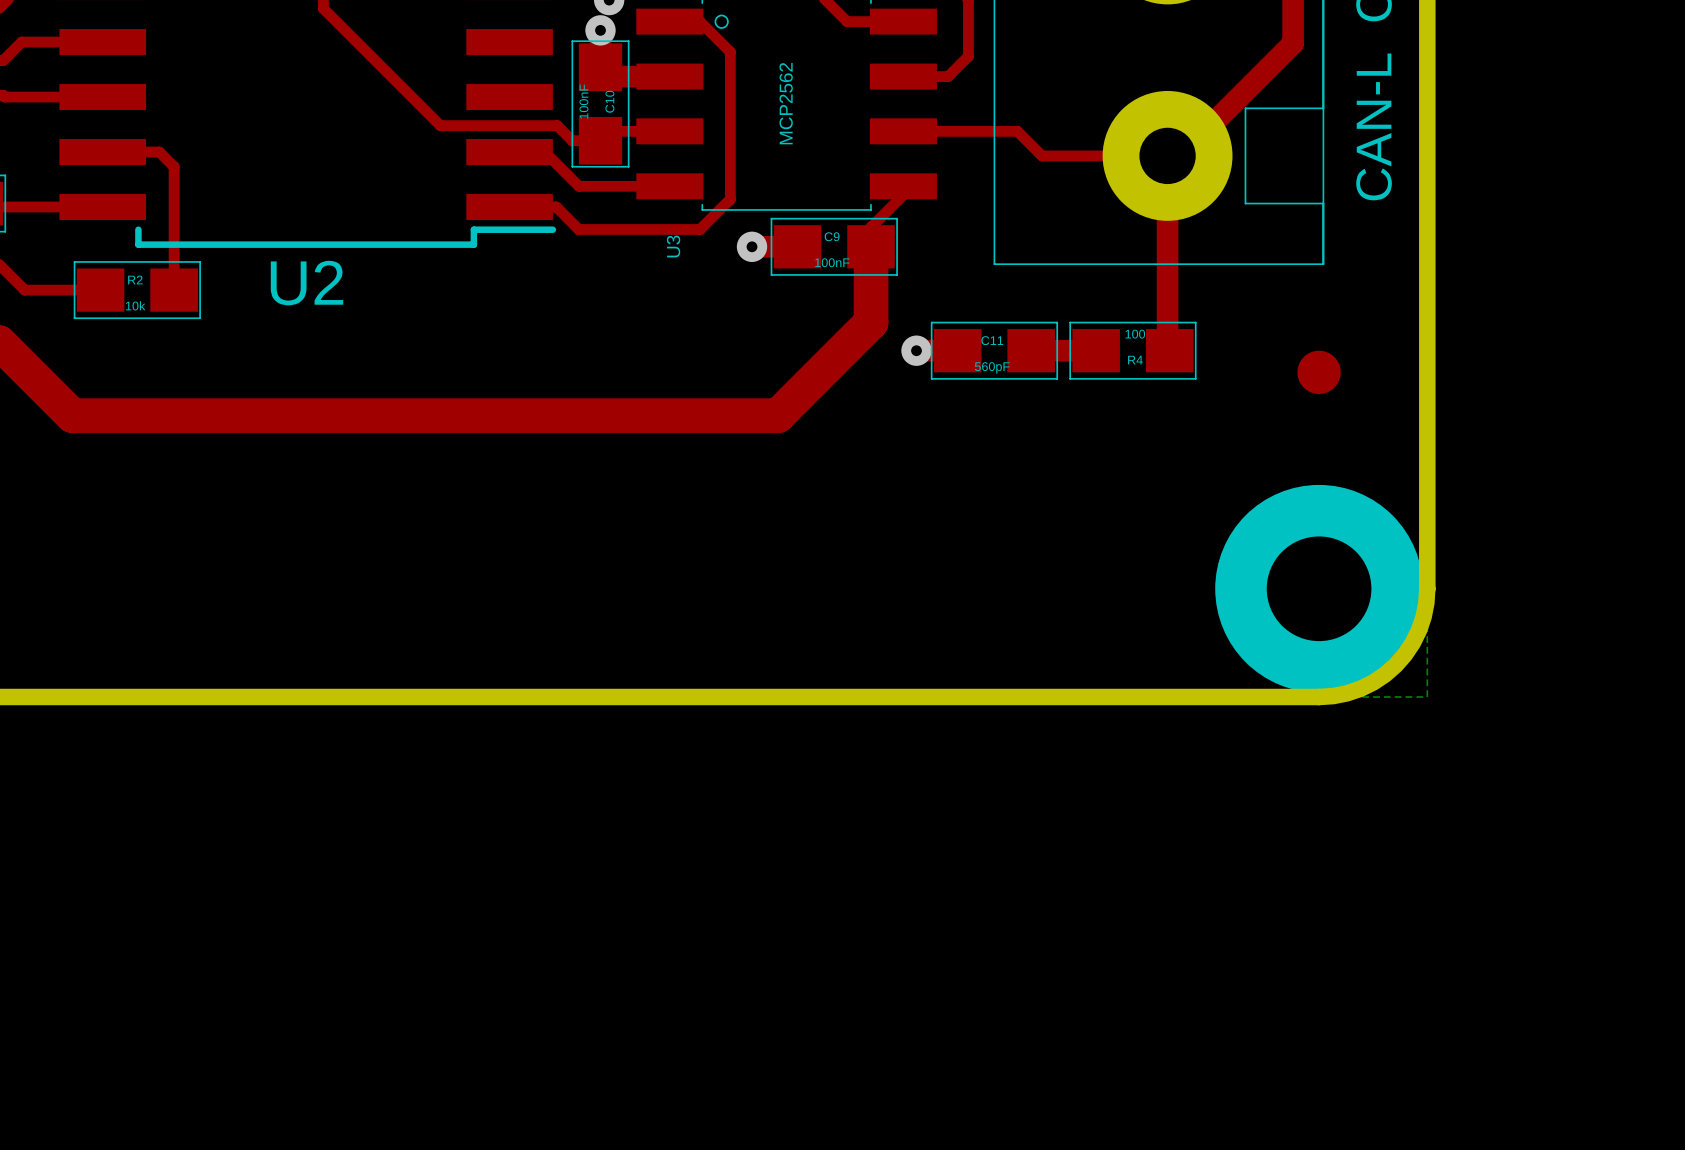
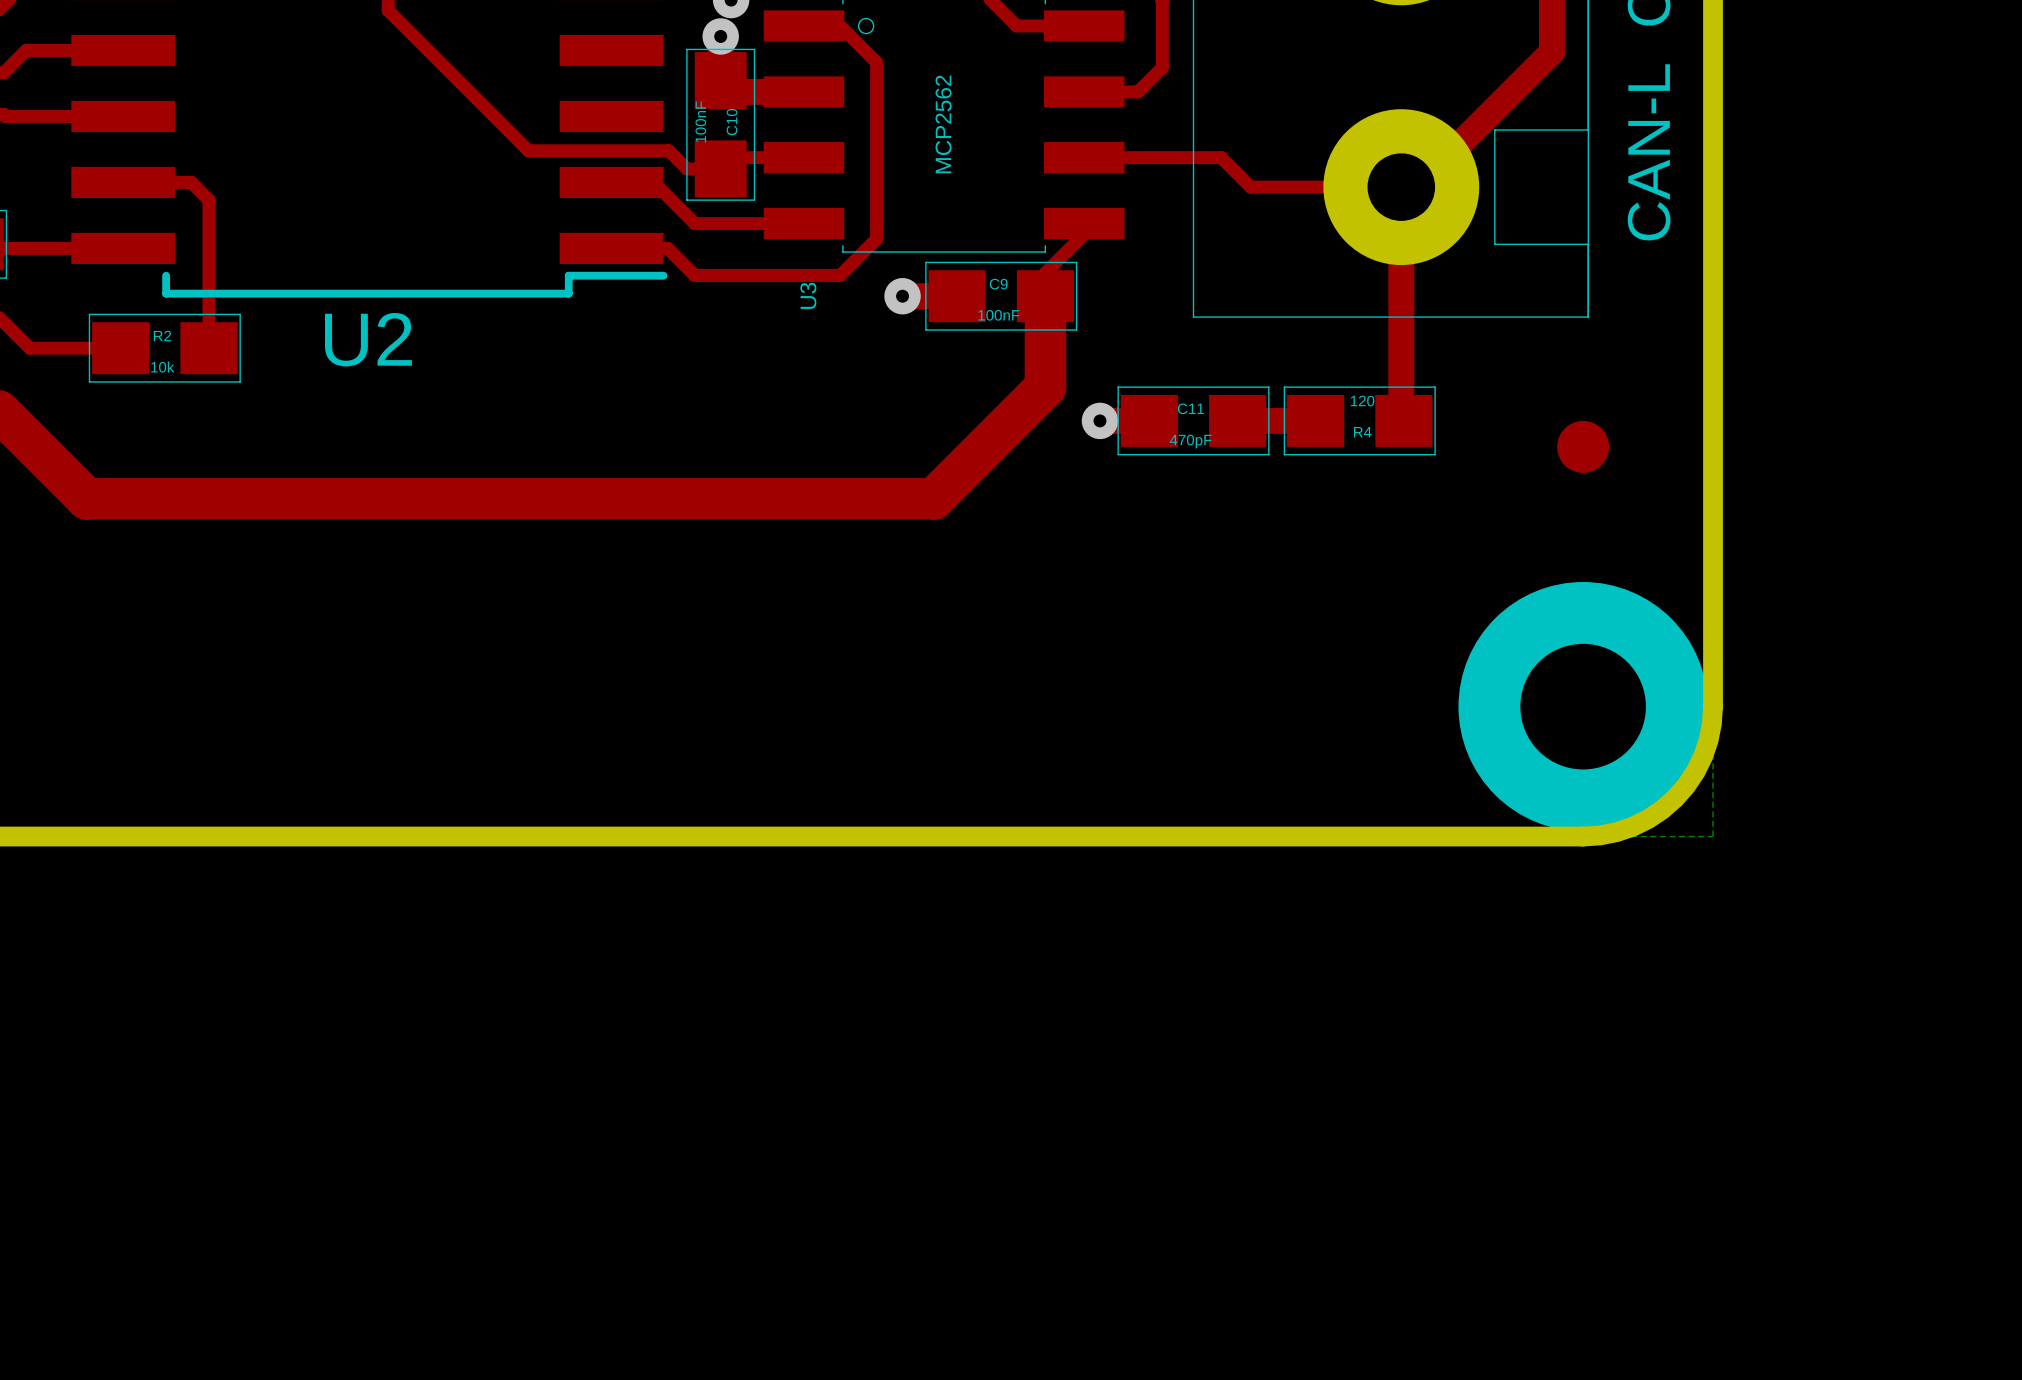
R4 value: 100 (1135, 334) -> 120 (1362, 401)
C11 value: 560pF (992, 367) -> 470pF (1190, 441)

